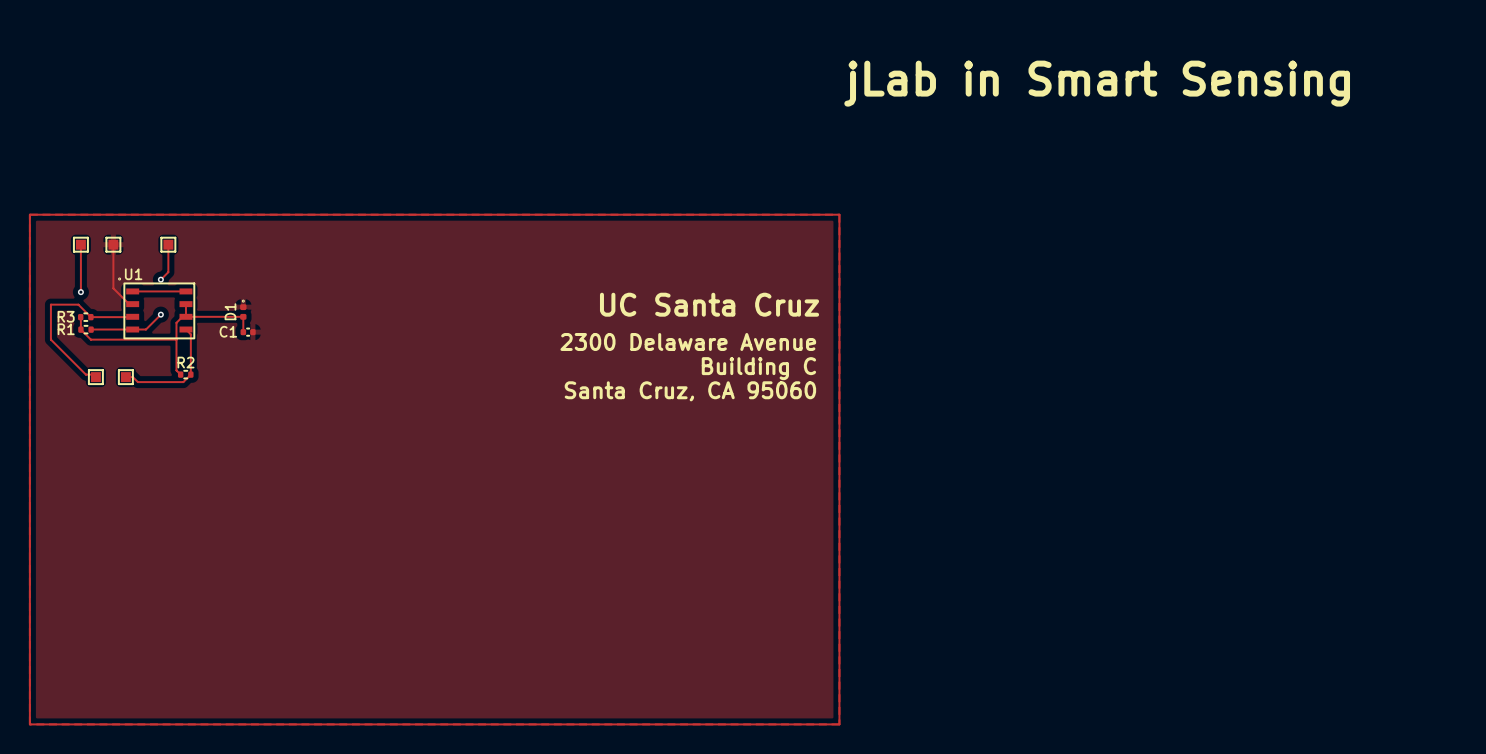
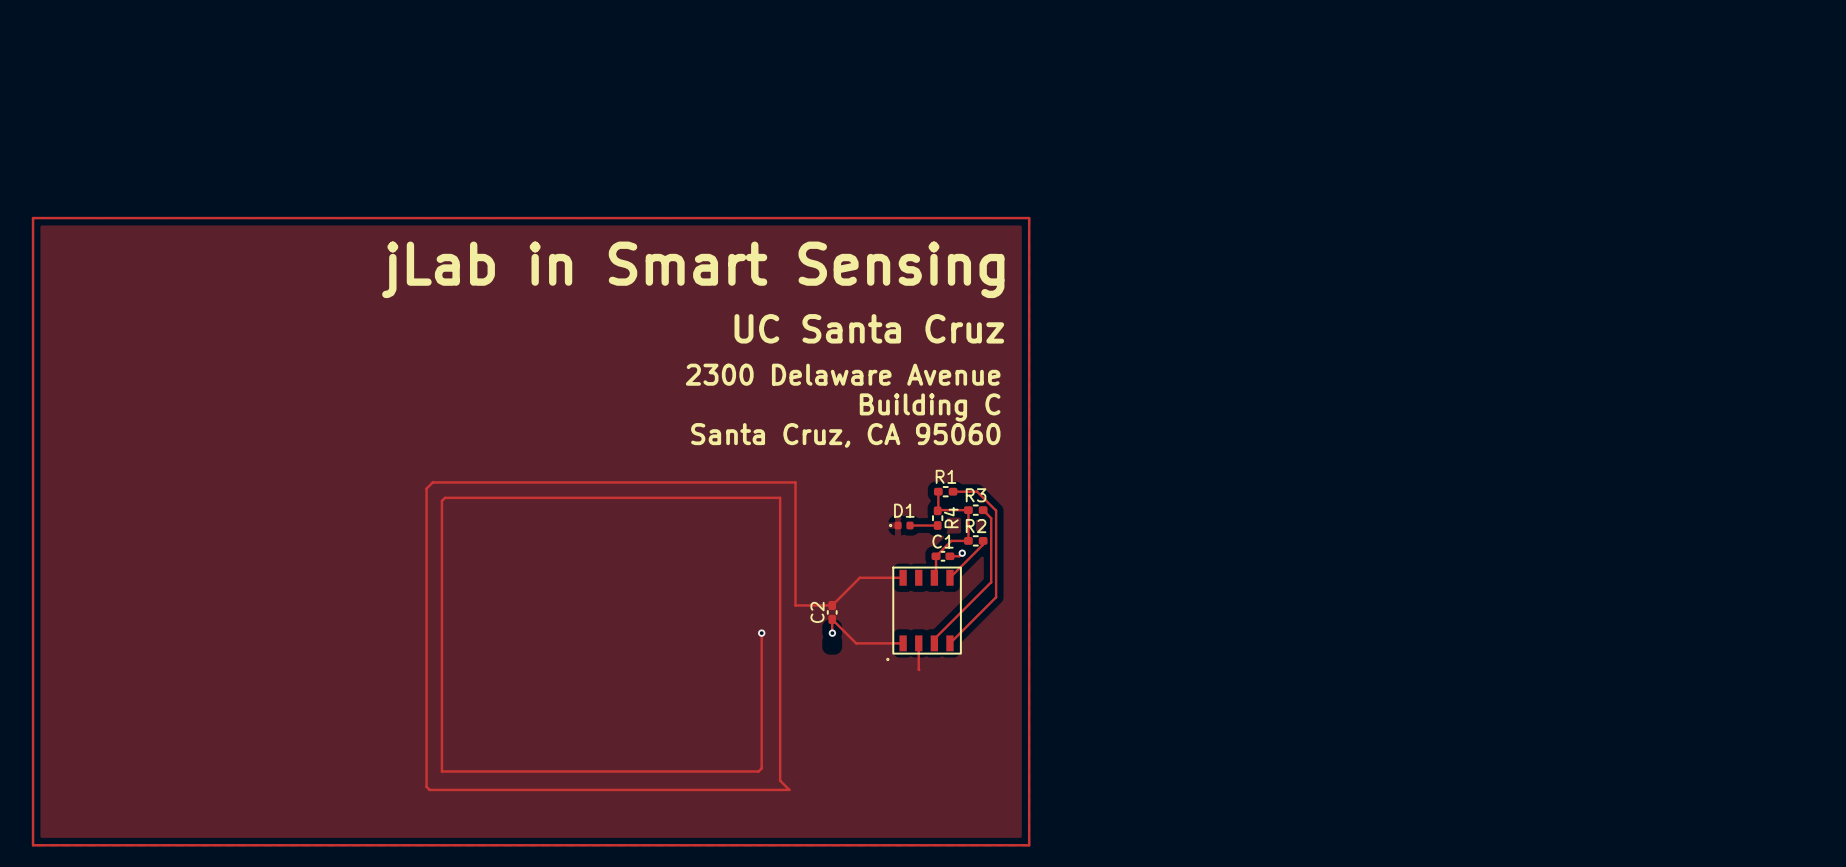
text: jLab in Smart Sensing (1097, 83) -> none
track: (80, 244) (80, 292) -> none
part: (80, 244) -> none
track: (113, 244) (113, 288) (129, 304) (132, 304) -> none
part: (113, 244) -> none
track: (168, 244) (168, 272) (160, 279) -> none
part: (168, 244) -> none
text: none -> jLab in Smart Sensing (693, 269)
via: (160, 279) -> none
track: (132, 291) (185, 291) -> none
via: (80, 292) -> none
track: (185, 304) (185, 316) -> none
U1: (156, 308) -> none
D1 rotation: 0° (243, 309) -> 90° counterclockwise (901, 525)
D1 position: (243, 309) -> (901, 525)
R3 footprint: [78, 312, 94, 322] -> [964, 504, 988, 516]
track: (160, 314) (146, 329) (91, 329) -> none
via: (160, 314) -> none
R3 name position: R3 (66, 316) -> R3 (976, 495)
track: (132, 316) (90, 317) (78, 304) (50, 304) (50, 339) (85, 374) (93, 374) (95, 377) -> none
track: (80, 317) (80, 329) (90, 339) (176, 339) -> none
R1 footprint: [78, 325, 94, 335] -> [933, 486, 958, 498]
C1 footprint: [240, 327, 256, 337] -> [931, 551, 955, 562]
R1 name position: R1 (66, 329) -> R1 (945, 476)
track: (185, 329) (190, 334) (190, 374) (183, 382) (137, 382) (132, 377) (125, 377) -> none
C1 name position: C1 (228, 331) -> C1 (942, 541)
track: (243, 332) (243, 316) (182, 316) (176, 322) (176, 370) (180, 374) -> none
R2 footprint: [177, 370, 194, 380] -> [964, 535, 988, 547]
part: (95, 377) -> none
part: (125, 377) -> none
track: none -> (938, 491) (938, 510)
track: none -> (953, 491) (977, 491) (996, 510) (996, 597) (949, 643)
track: none -> (938, 510) (968, 510) (968, 540) (951, 540) (936, 556) (936, 576) (934, 577)
track: none -> (983, 510) (991, 518) (991, 582) (934, 639) (934, 643)
R4: none -> (937, 518)
track: none -> (910, 525) (937, 525)
track: none -> (983, 540) (983, 544) (949, 577)
track: none -> (962, 553) (959, 556) (949, 556)
via: none -> (962, 553)
track: none -> (903, 577) (859, 577) (832, 605) (795, 605) (795, 482) (432, 482) (426, 488) (426, 786) (429, 789) (789, 789) (780, 780) (780, 497) (445, 497) (441, 500) (441, 771) (758, 771) (761, 768) (761, 633)
C2: none -> (832, 612)
part: none -> (924, 613)
via: none -> (761, 633)
track: none -> (832, 633) (832, 619) (856, 643) (903, 643)
via: none -> (832, 633)
track: none -> (918, 643) (919, 670)

